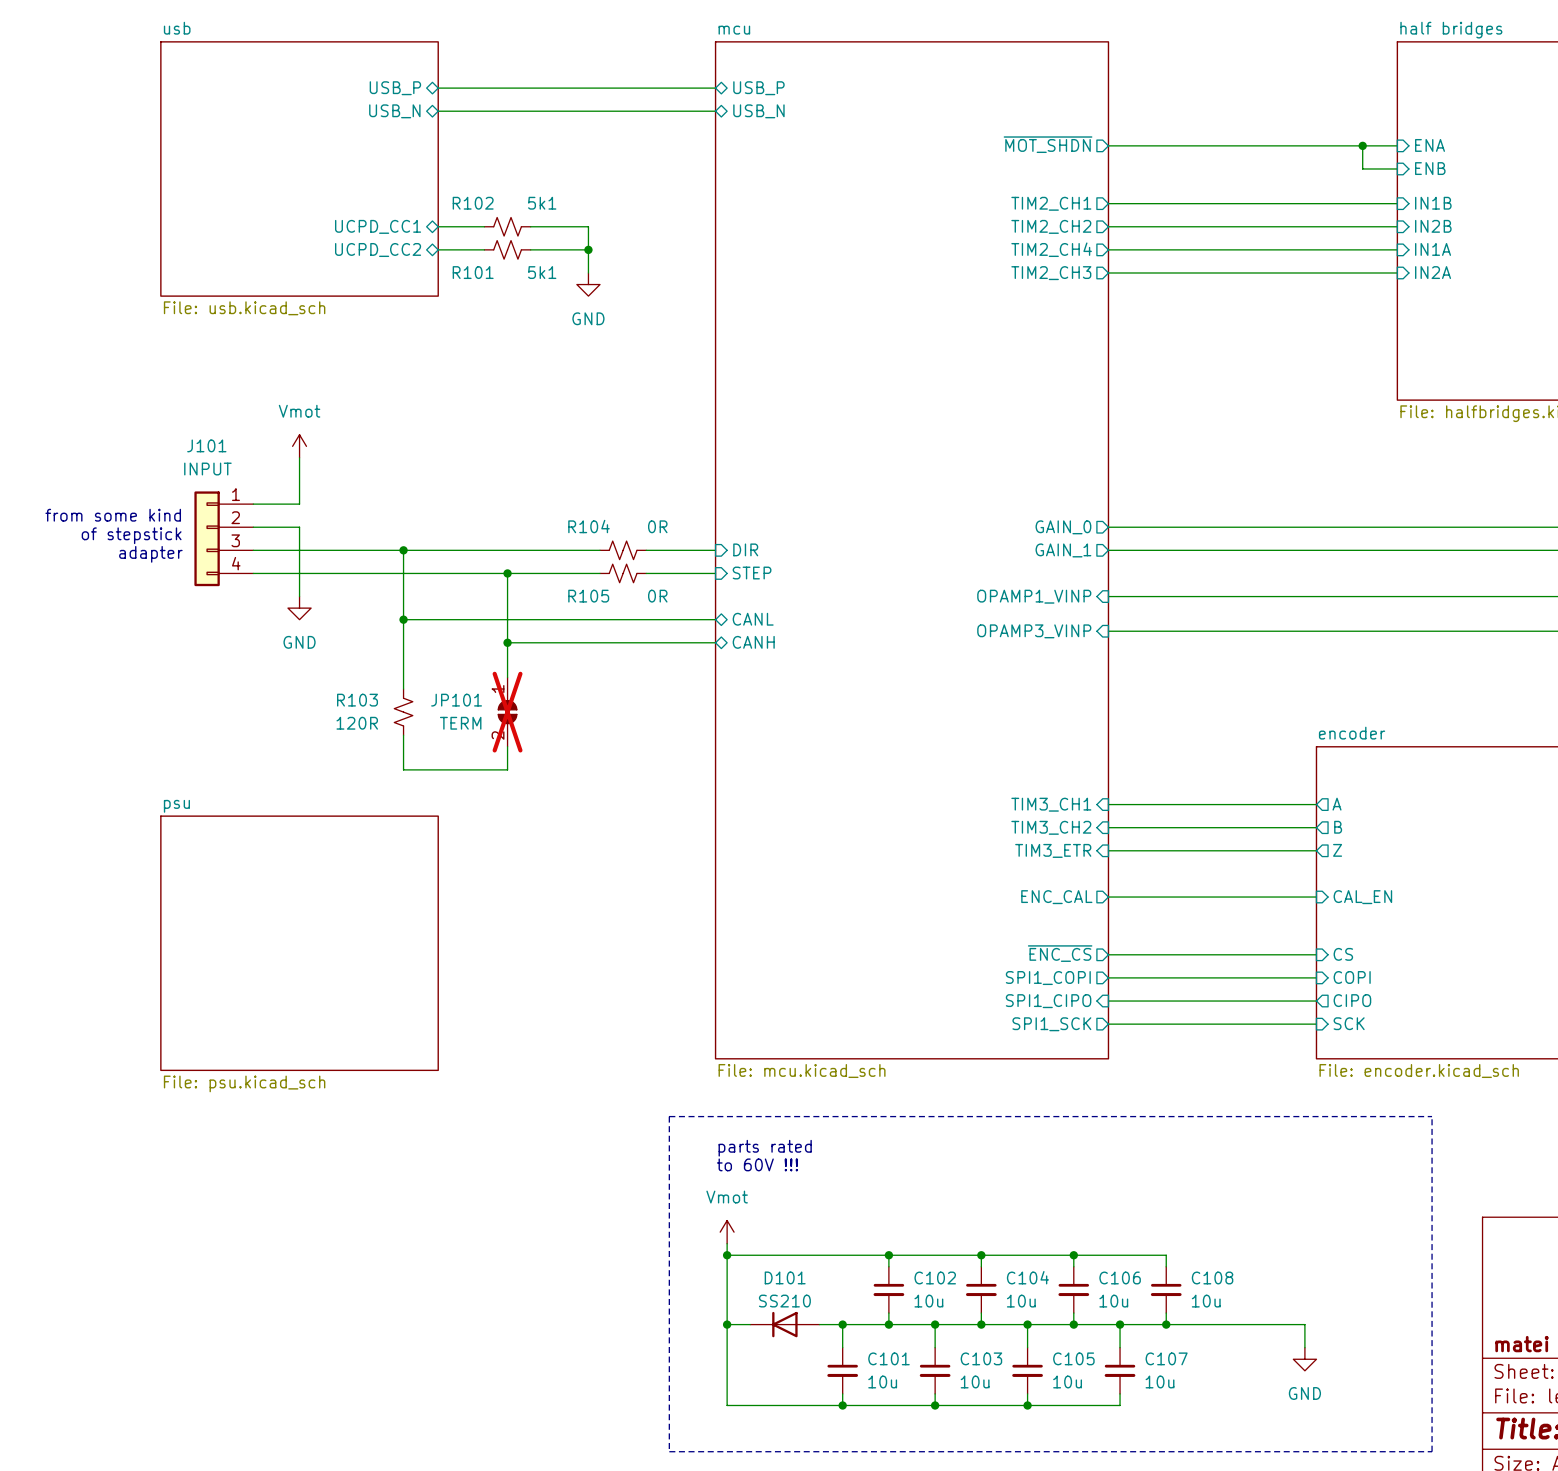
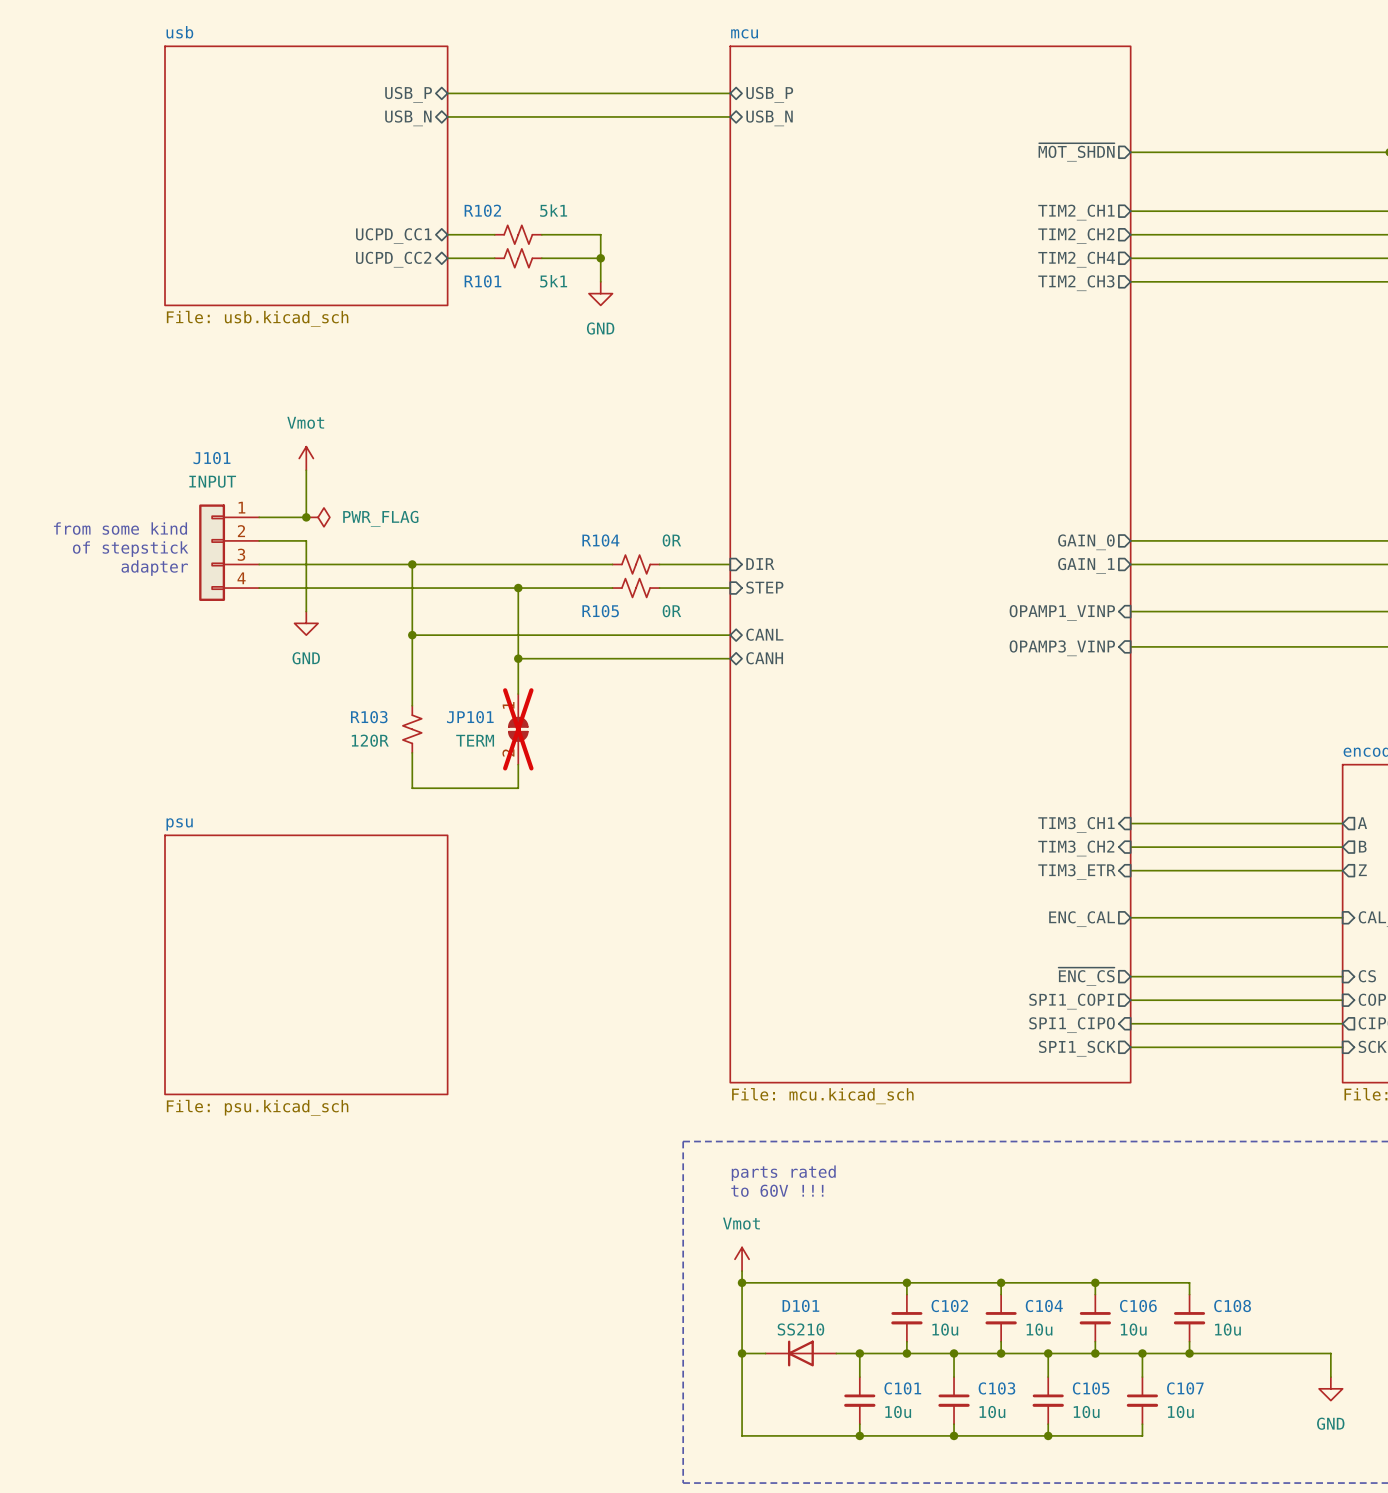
junction: none -> (306, 517)
power symbol: none -> PWR_FLAG (318, 517)

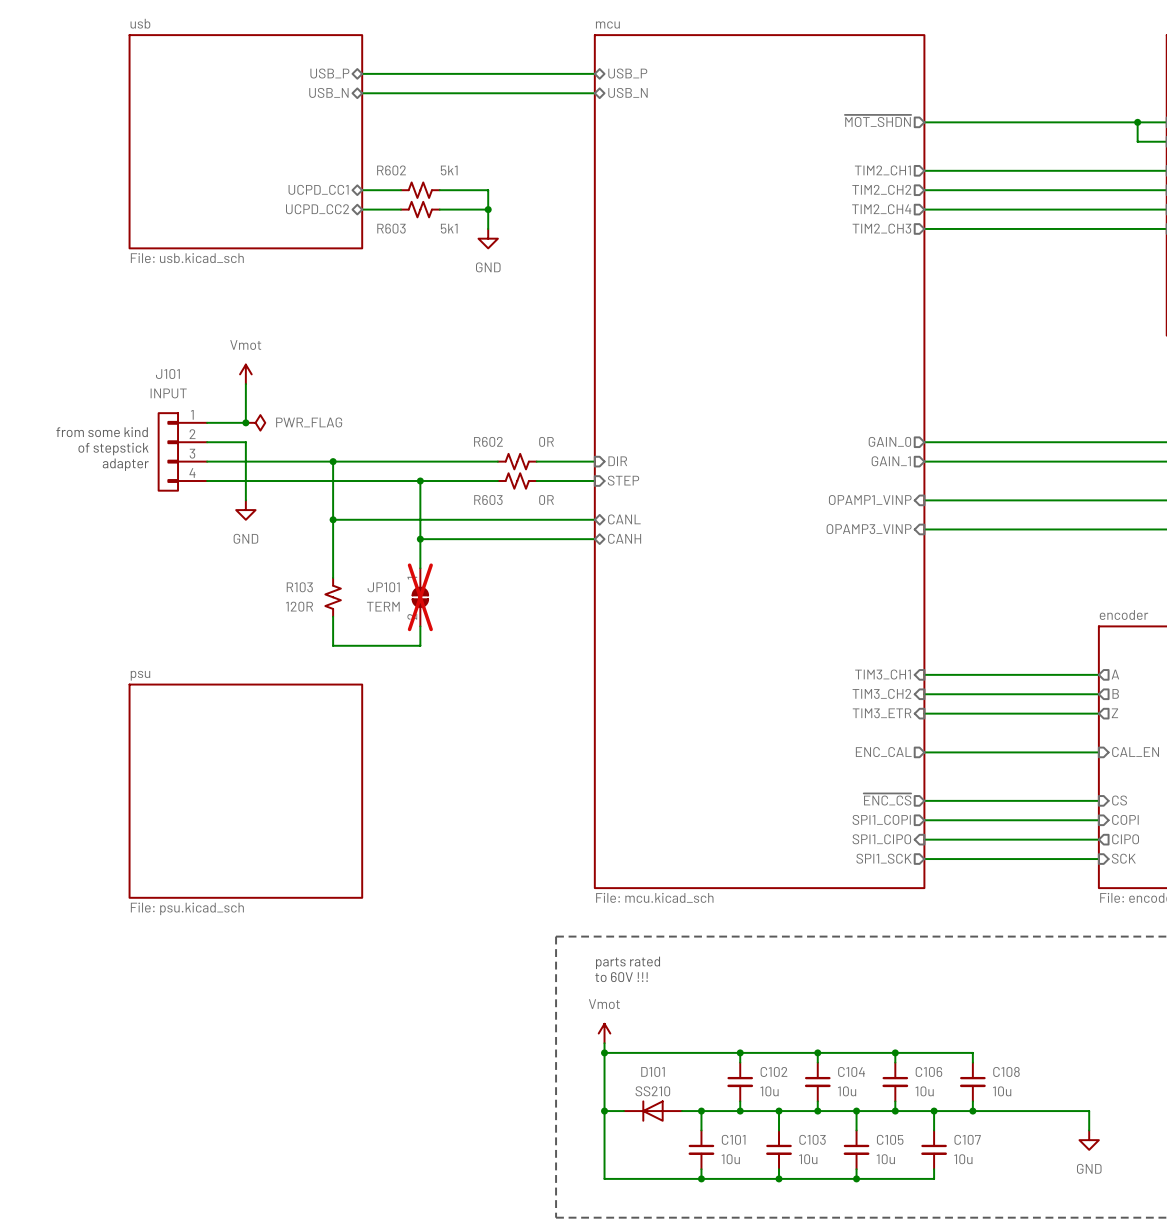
R102 name: R102 (482, 210) -> R602 (391, 170)
R101 name: R101 (482, 281) -> R603 (391, 228)
R104 name: R104 (600, 540) -> R602 (488, 441)
R105 name: R105 (600, 611) -> R603 (488, 500)

